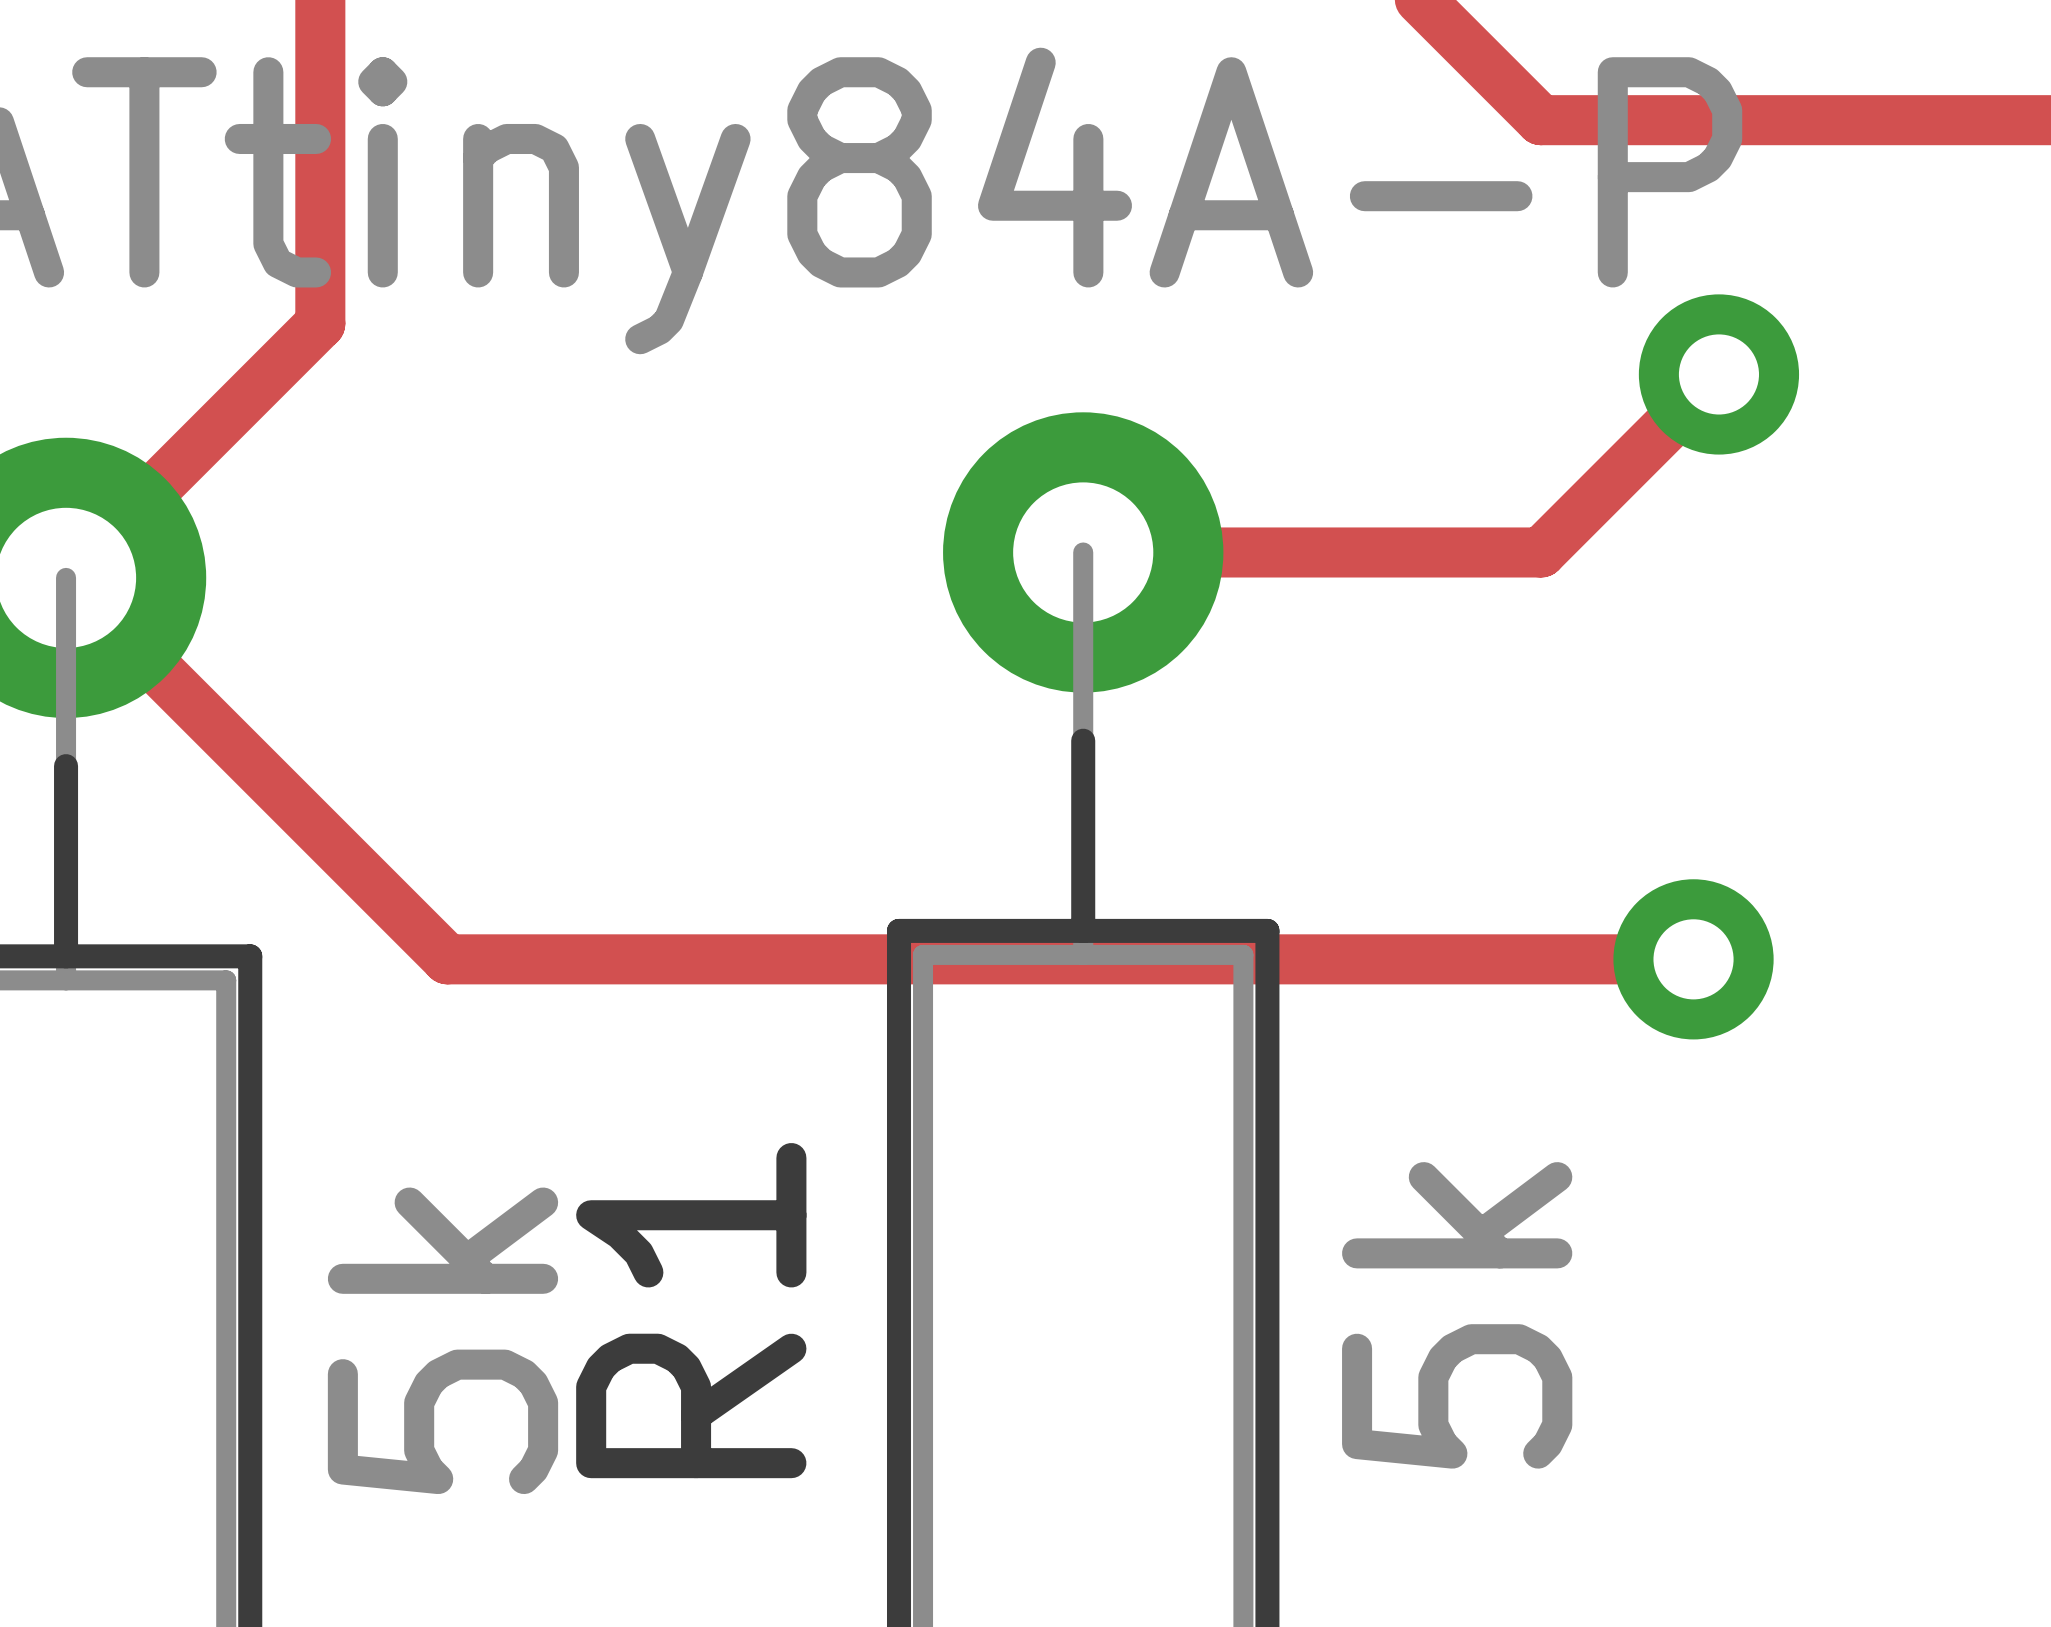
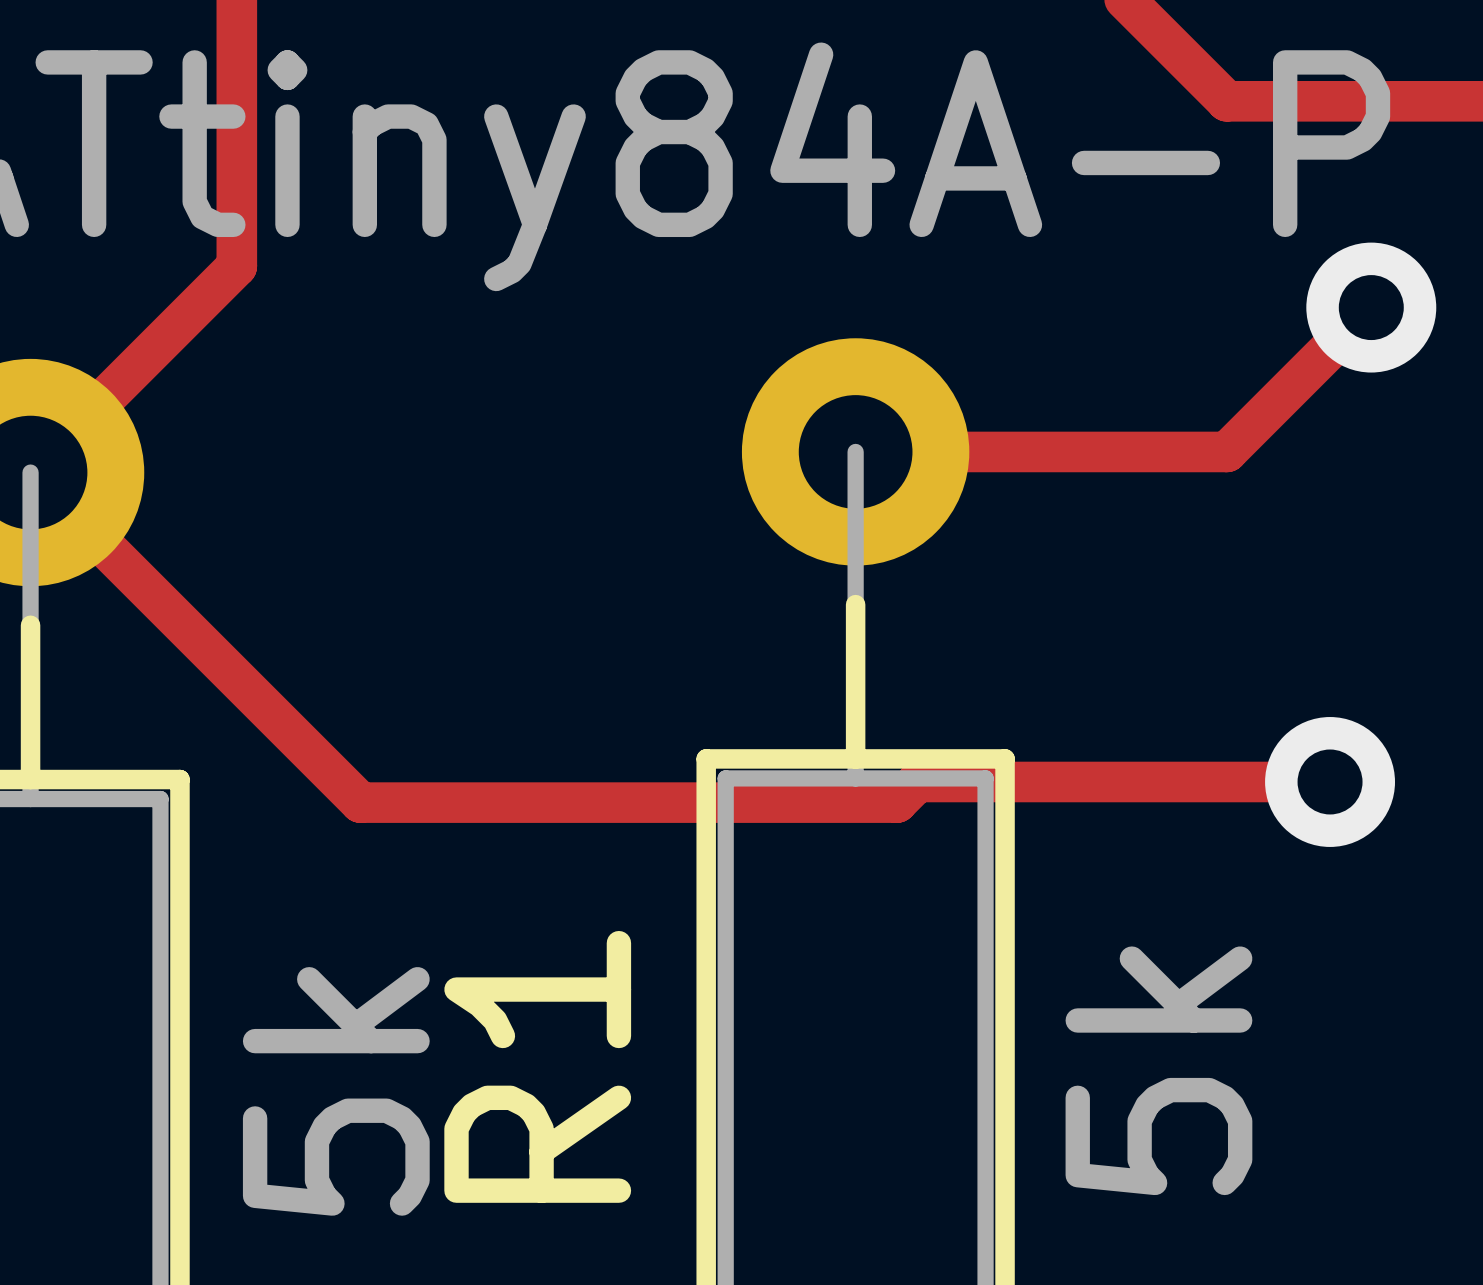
track: (447, 959) (1159, 959) -> (339, 781) (360, 802) (896, 802) (917, 781)
via position: (1693, 959) -> (1330, 781)

